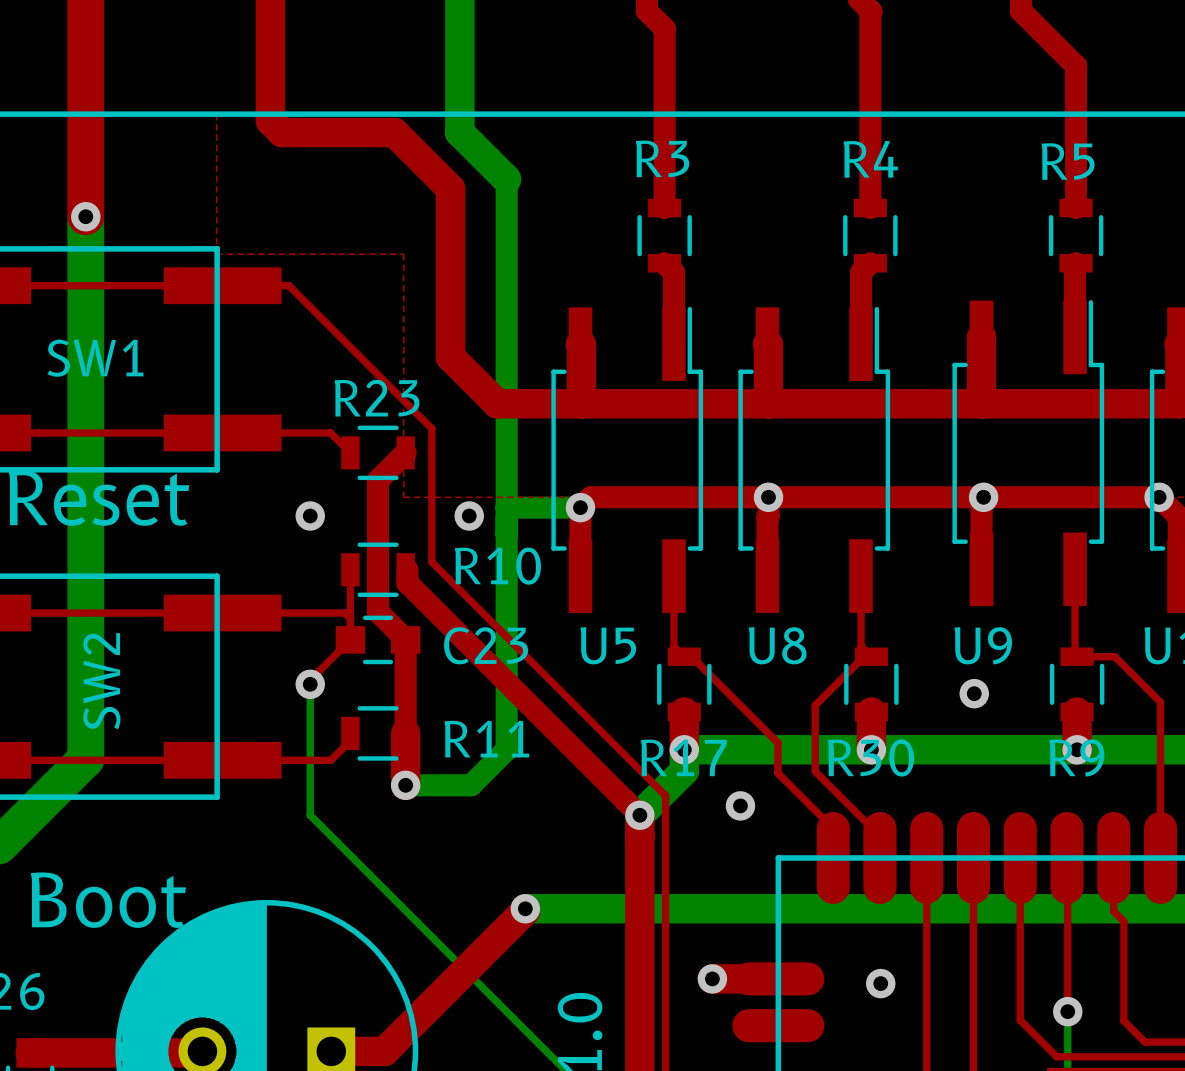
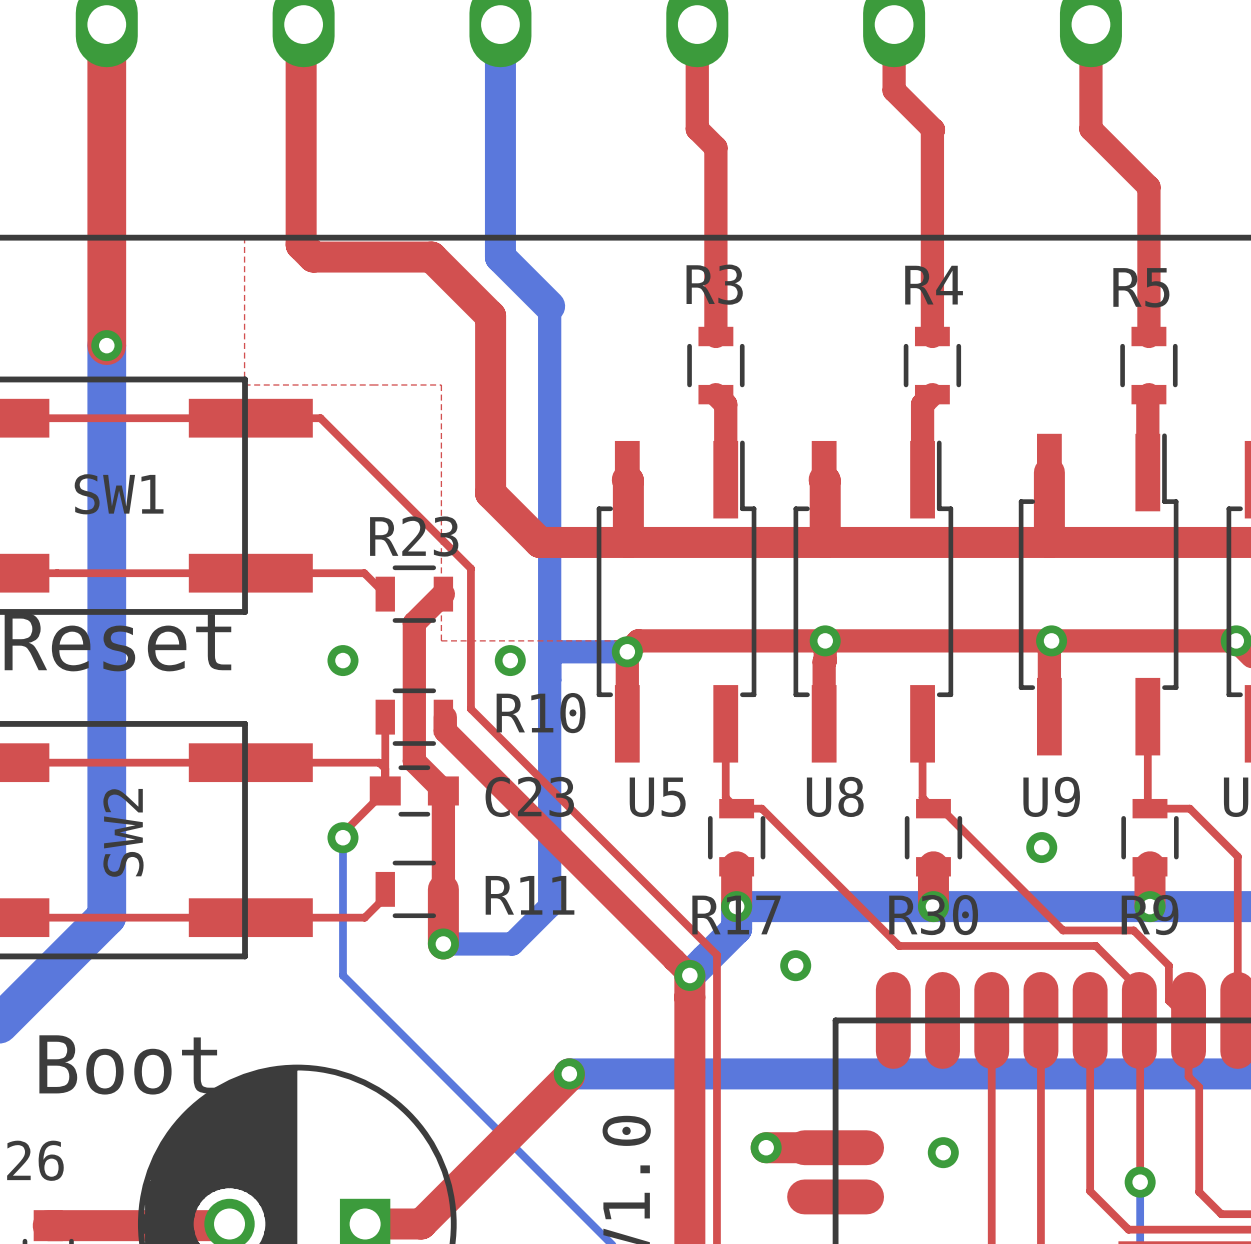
top track: (691, 656) (777, 742) (777, 773) (833, 828) (833, 857) -> (744, 808) (761, 808) (899, 945) (1095, 945) (1139, 989) (1139, 1020)
top track: (871, 656) (864, 656) (815, 705) (815, 771) (879, 836) (879, 857) -> (933, 808) (941, 808) (1063, 930) (1133, 930) (1168, 965) (1168, 1000) (1188, 1020)

